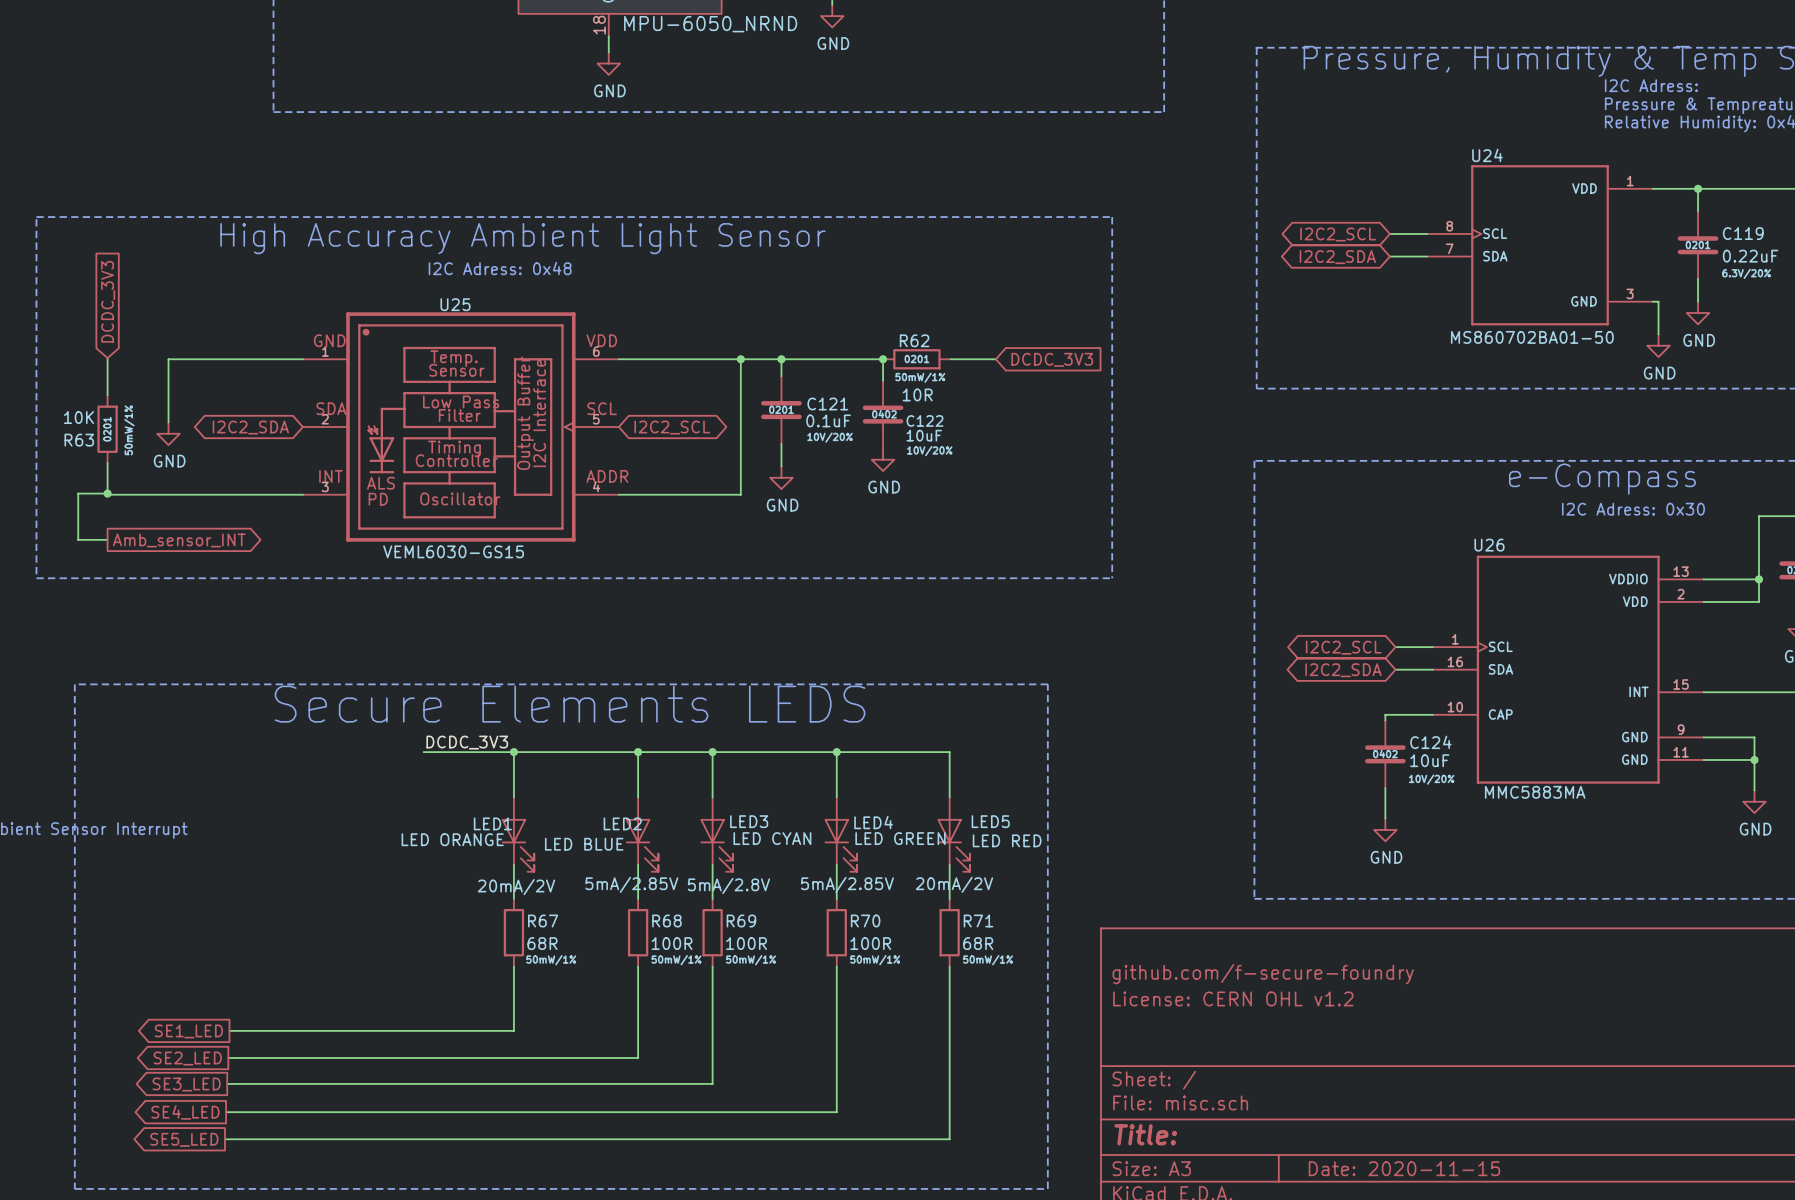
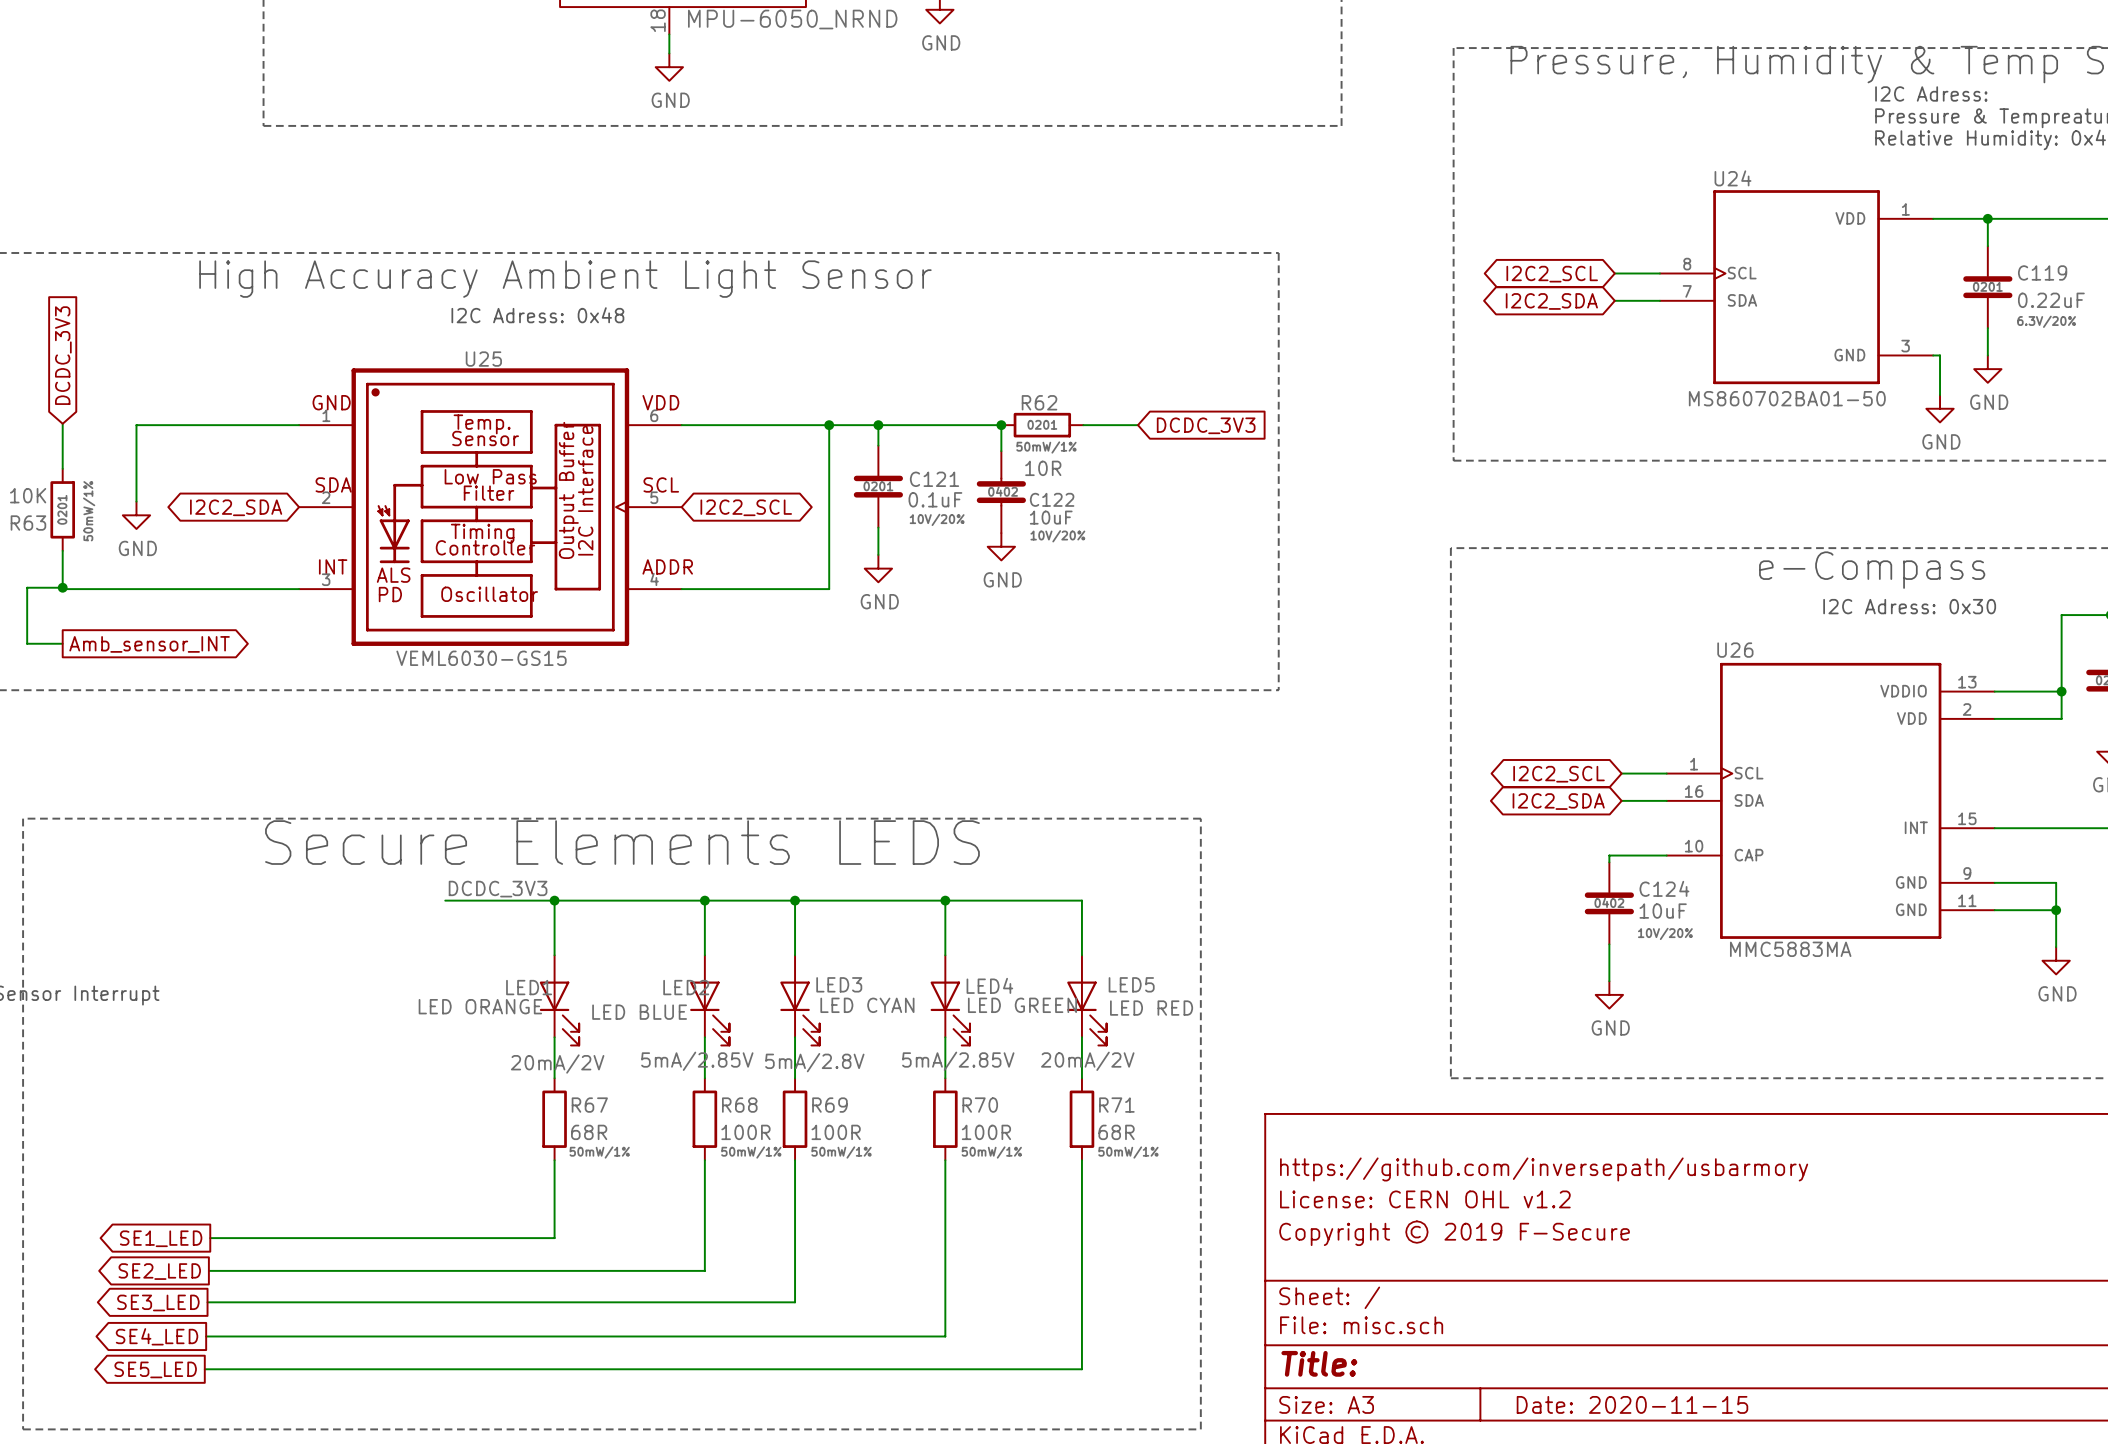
title block: github.com/f-secure-foundry (1263, 974) -> https://github.com/inversepath/usbarmory (1544, 1169)
title block: none -> Copyright © 2019 F-Secure (1454, 1233)

